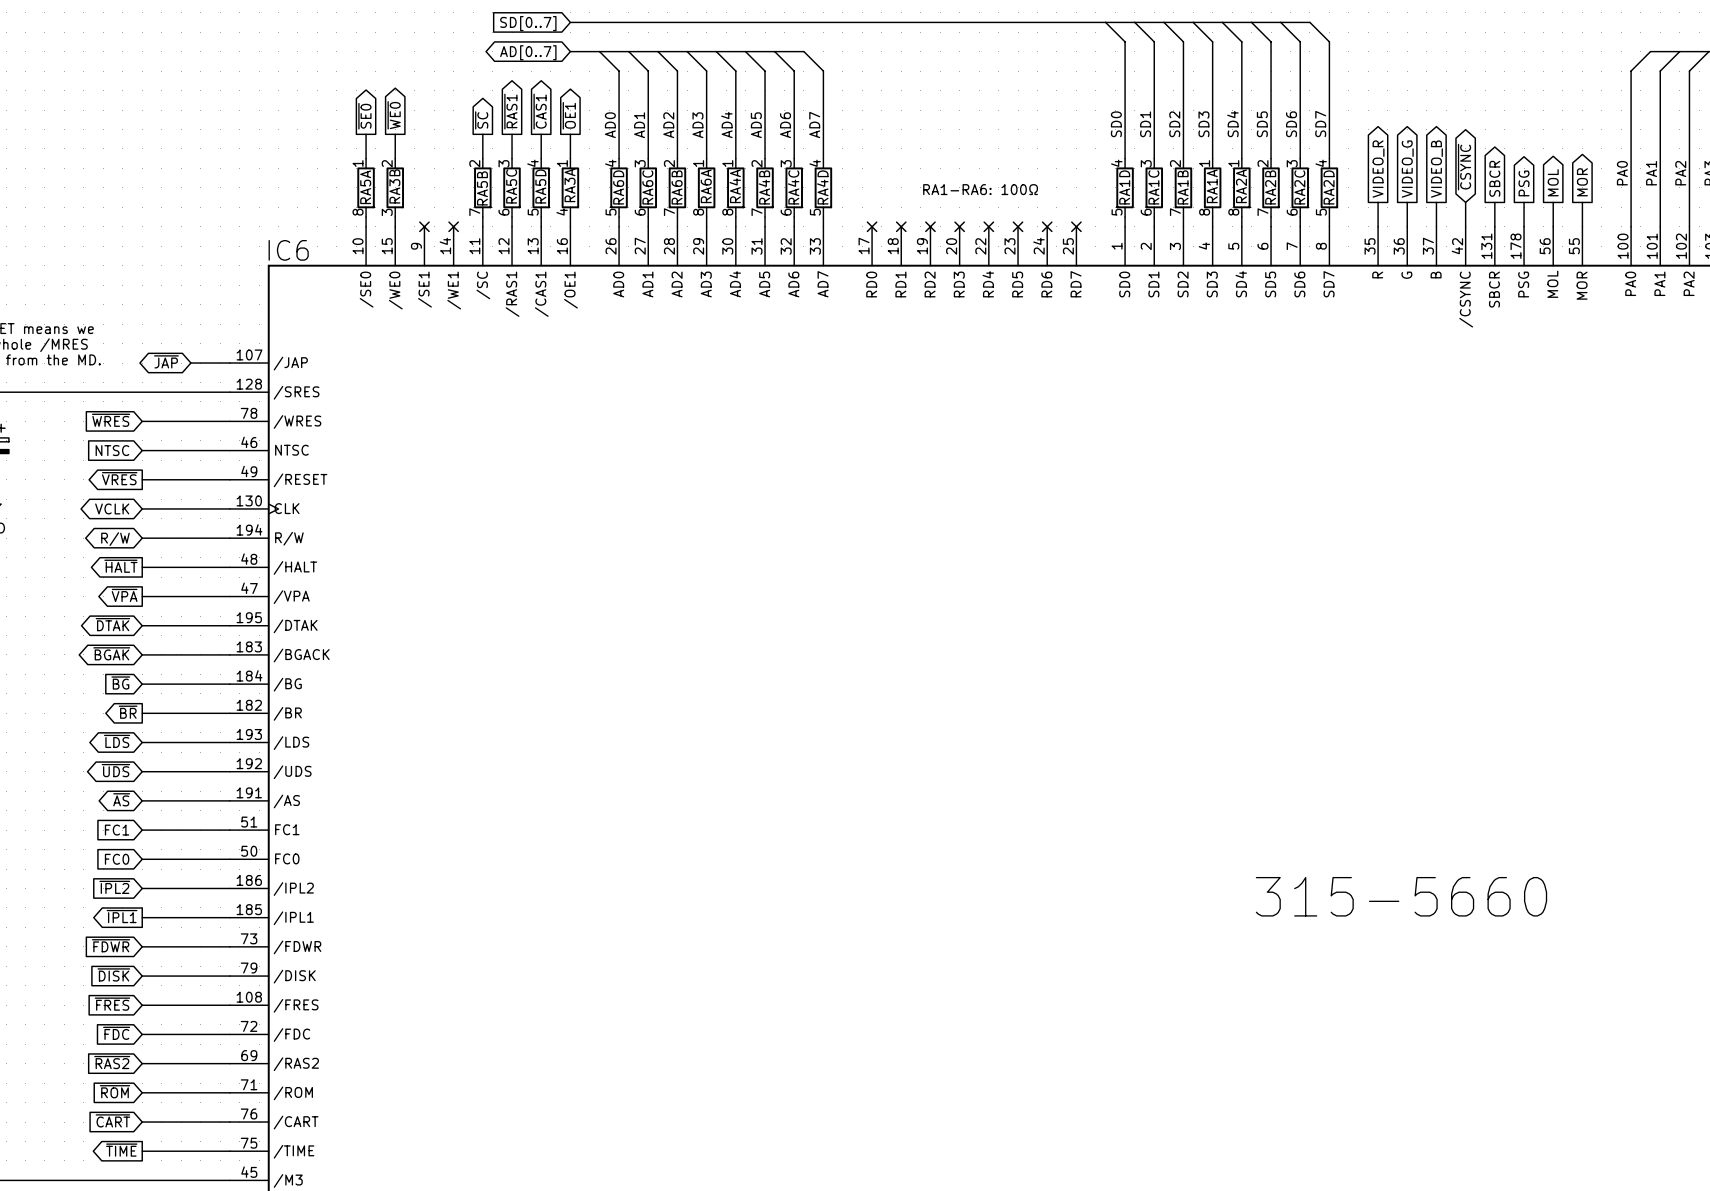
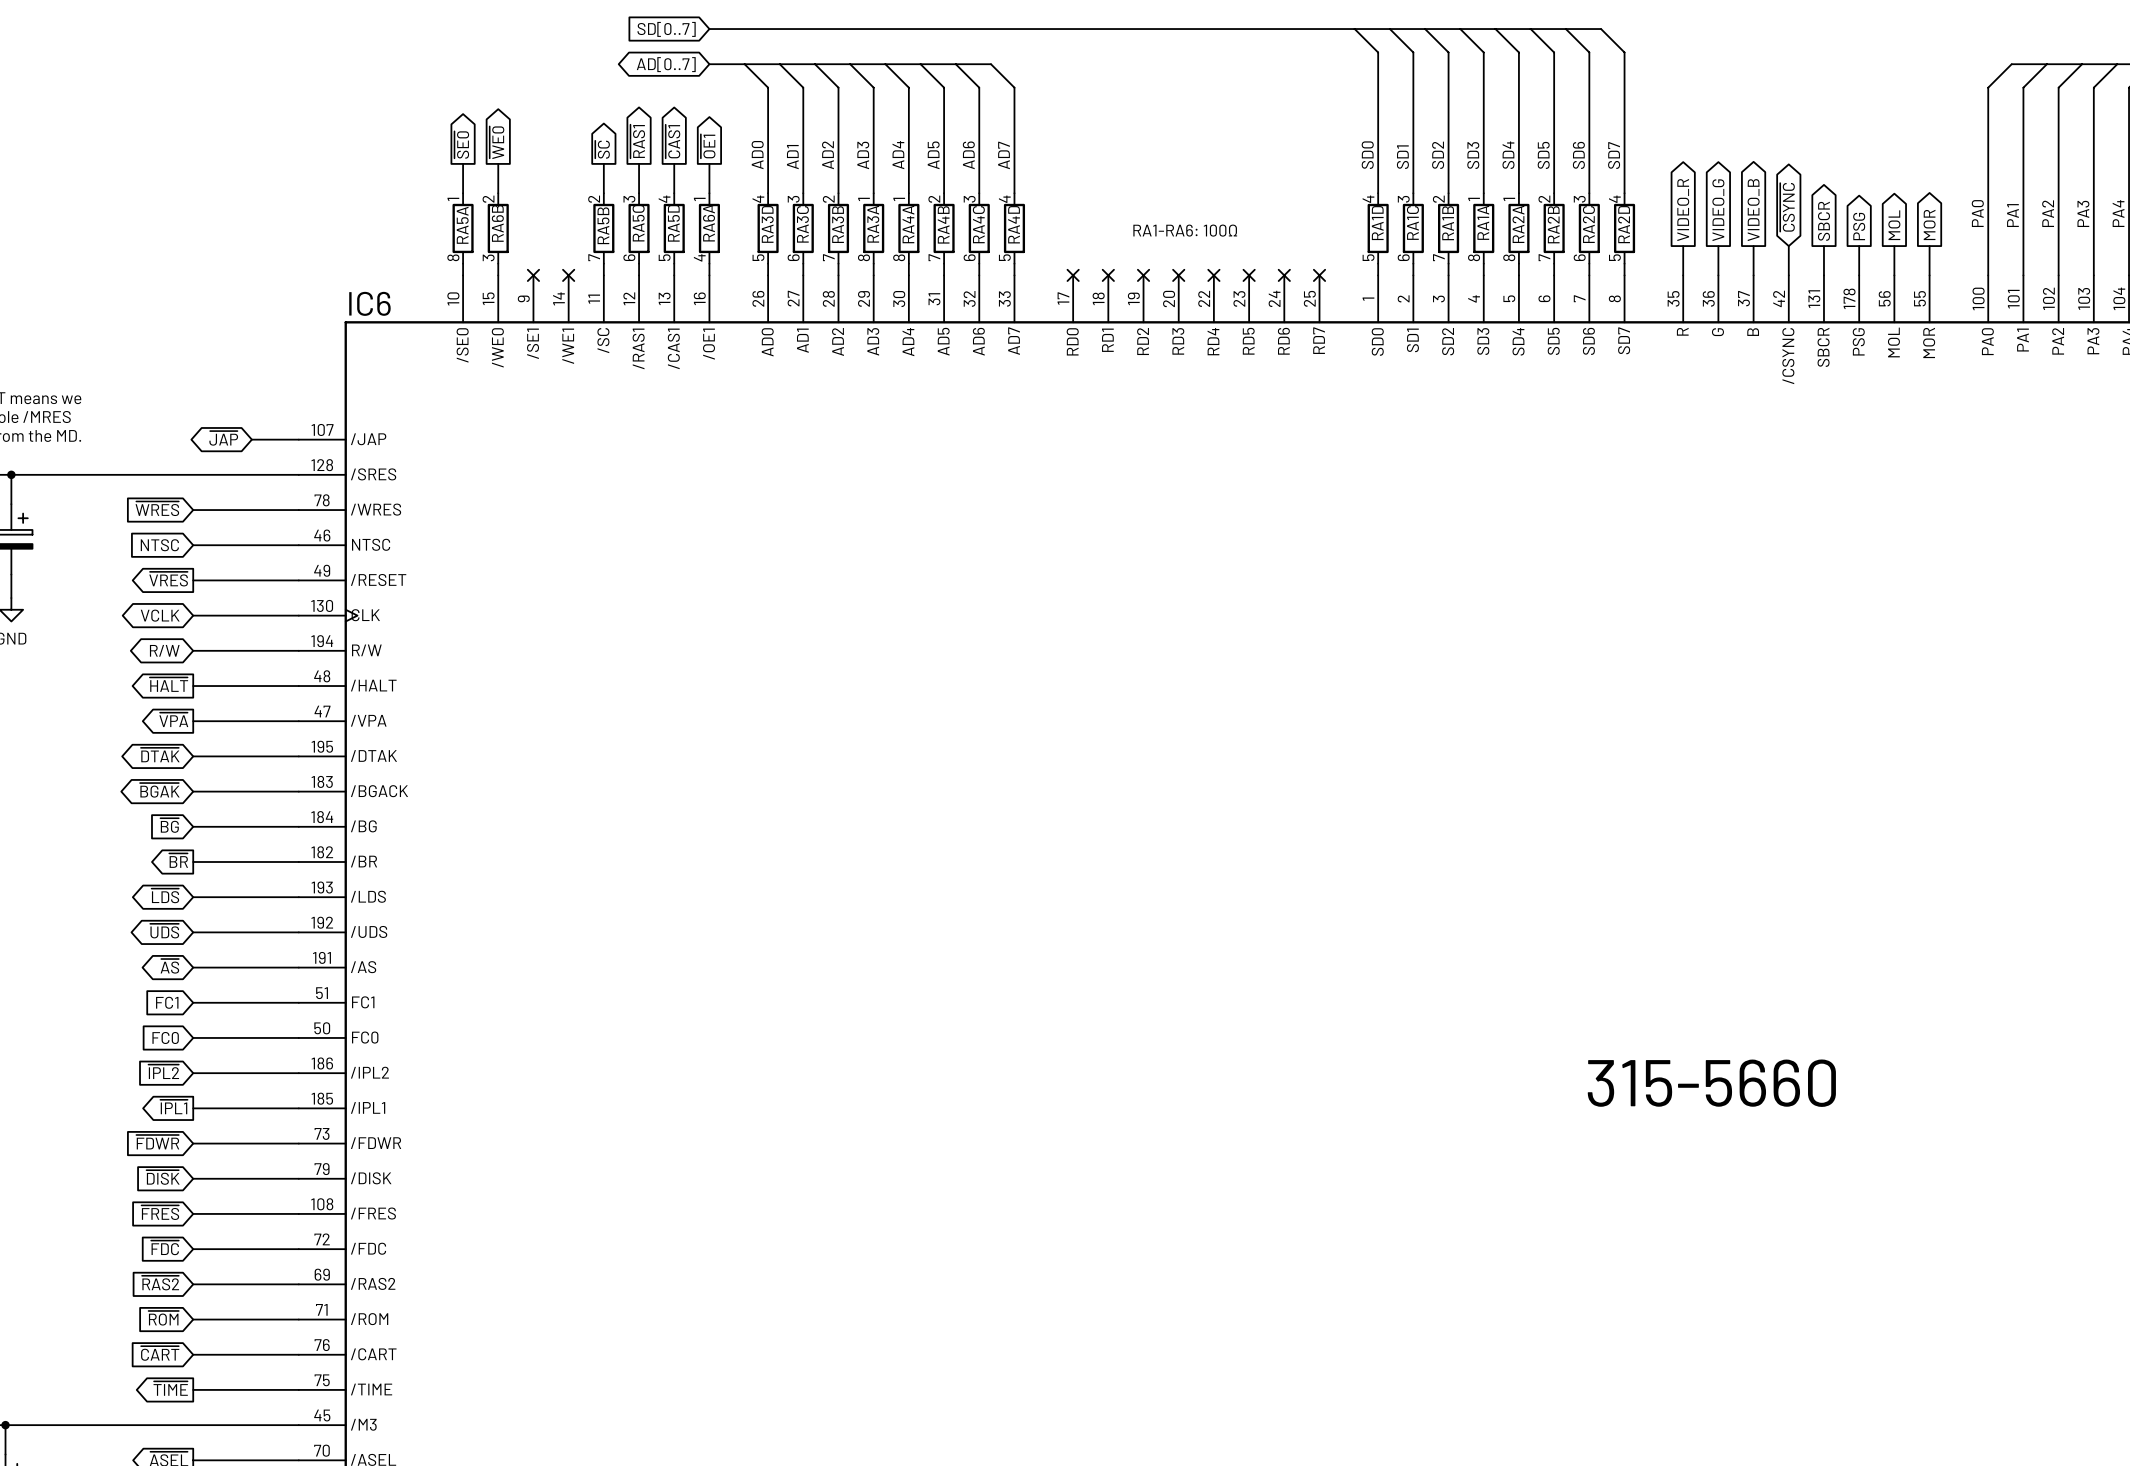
RA3A name: RA3A (570, 185) -> RA6A (708, 222)
RA3B name: RA3B (394, 186) -> RA6B (497, 223)
RA6A name: RA6A (706, 186) -> RA3A (873, 224)
RA6D name: RA6D (618, 187) -> RA3D (767, 224)
RA6C name: RA6C (647, 187) -> RA3C (802, 224)
RA6B name: RA6B (677, 187) -> RA3B (838, 224)

